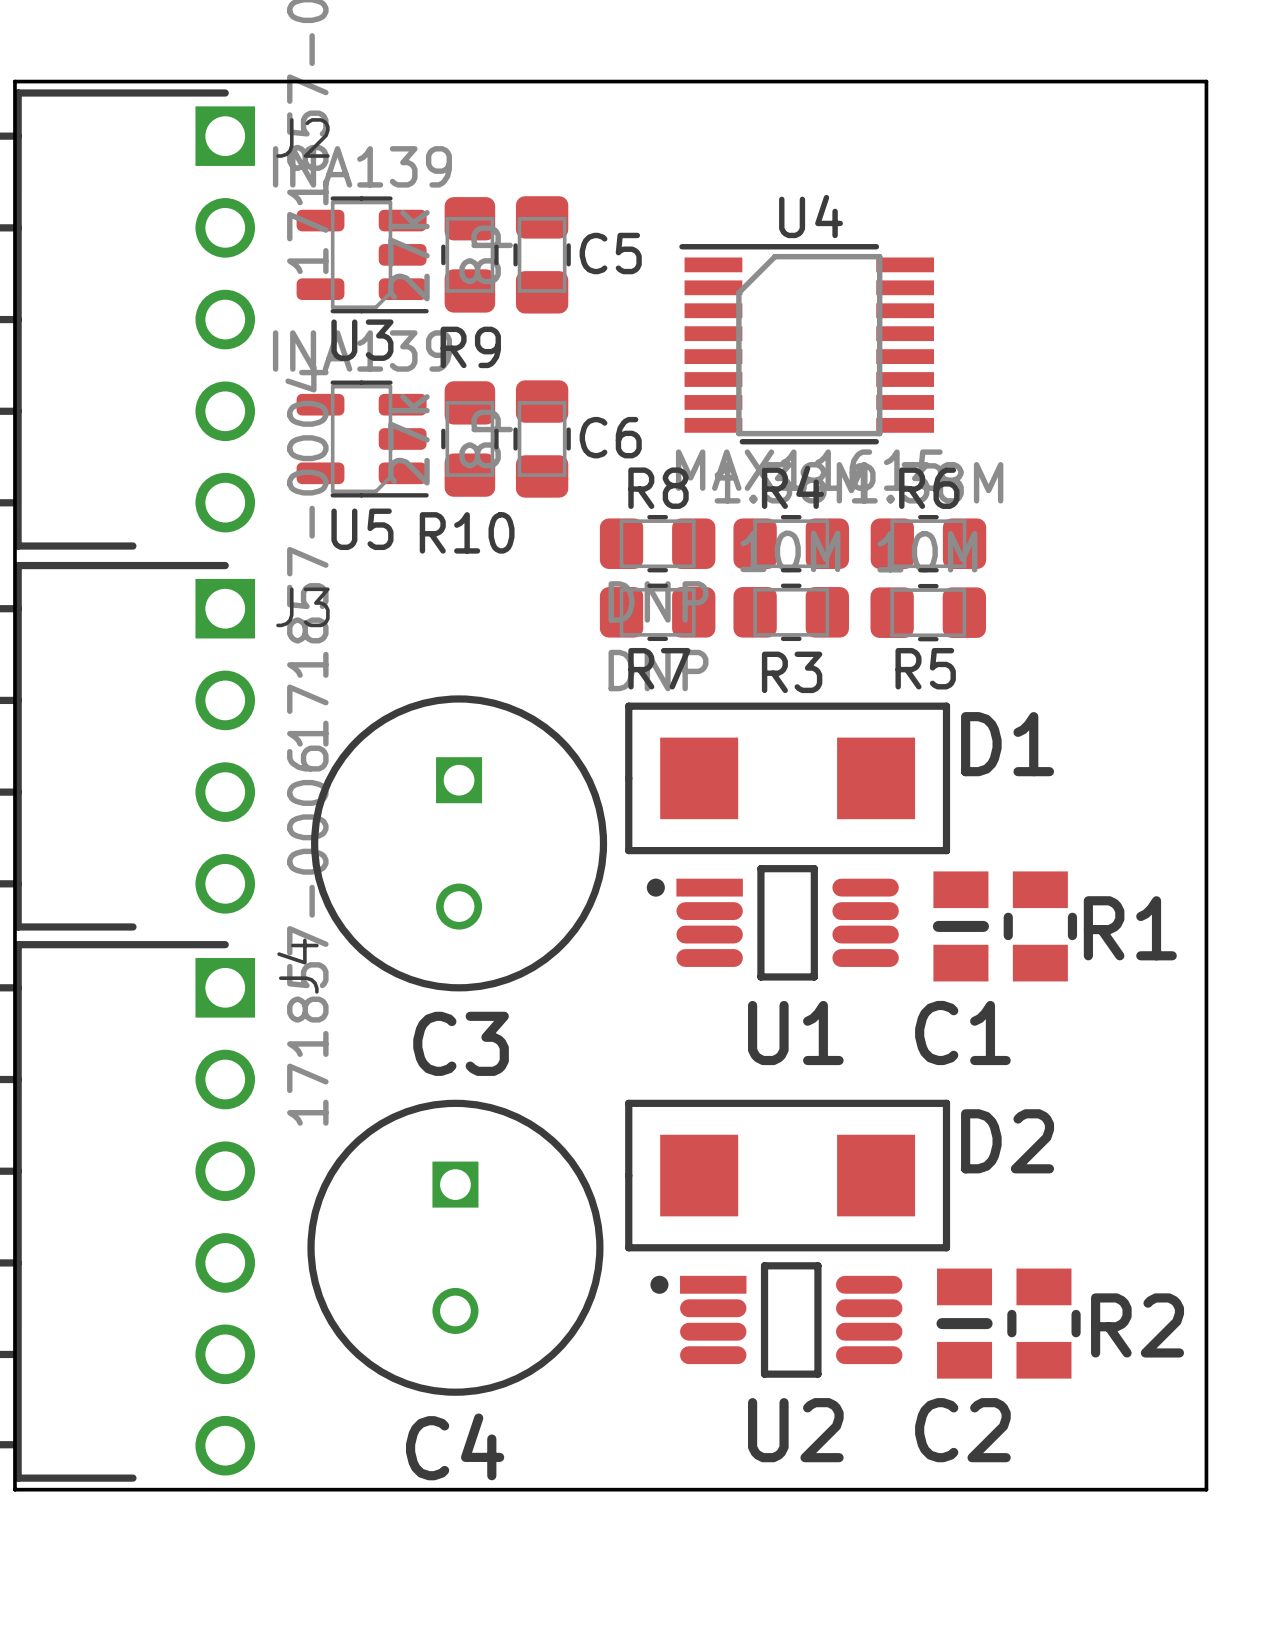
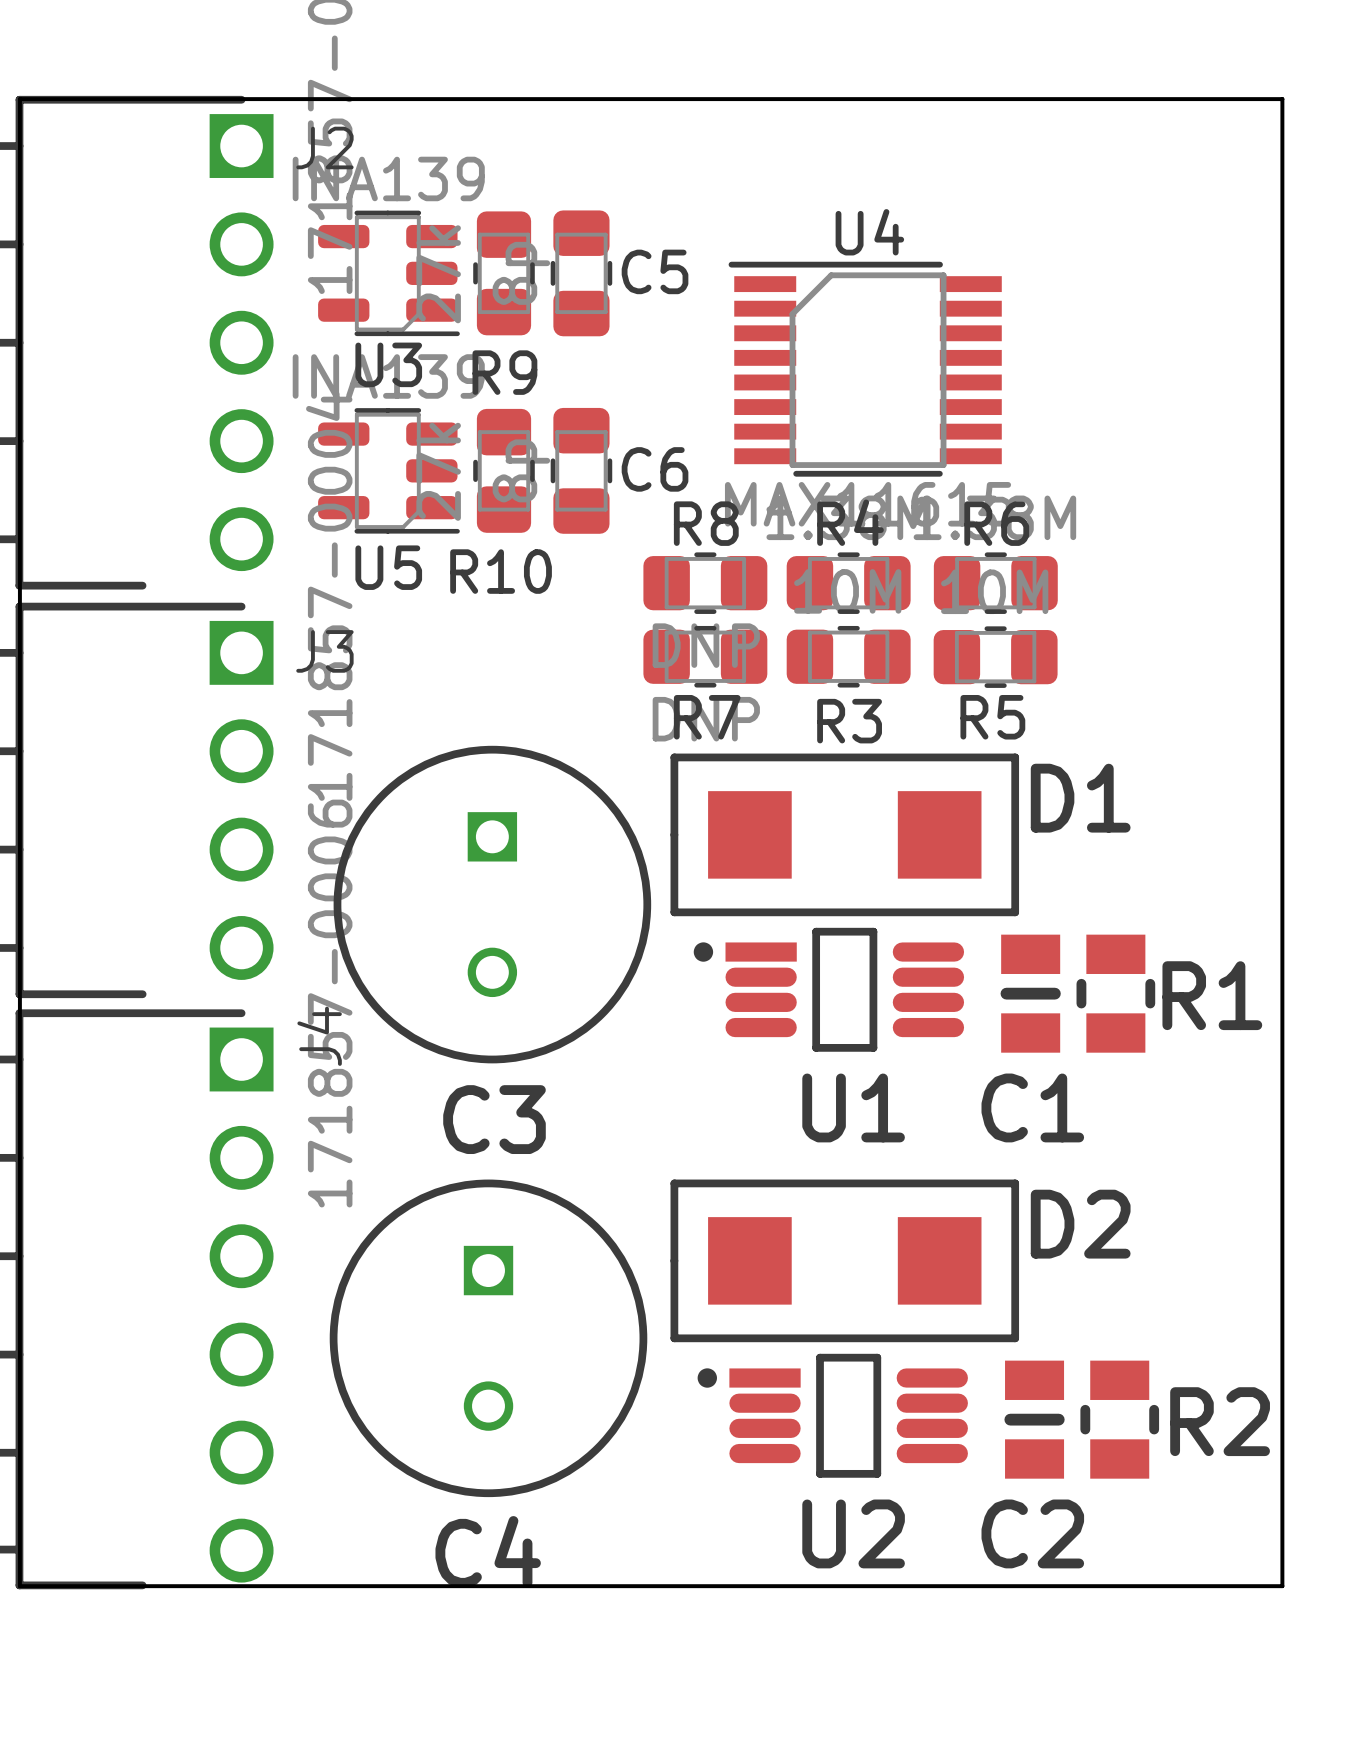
board edge: (14, 81) (1206, 81) (1206, 1489) (14, 1489) (14, 81) -> (19, 99) (19, 1586) (1282, 1586) (1282, 99) (19, 99)

